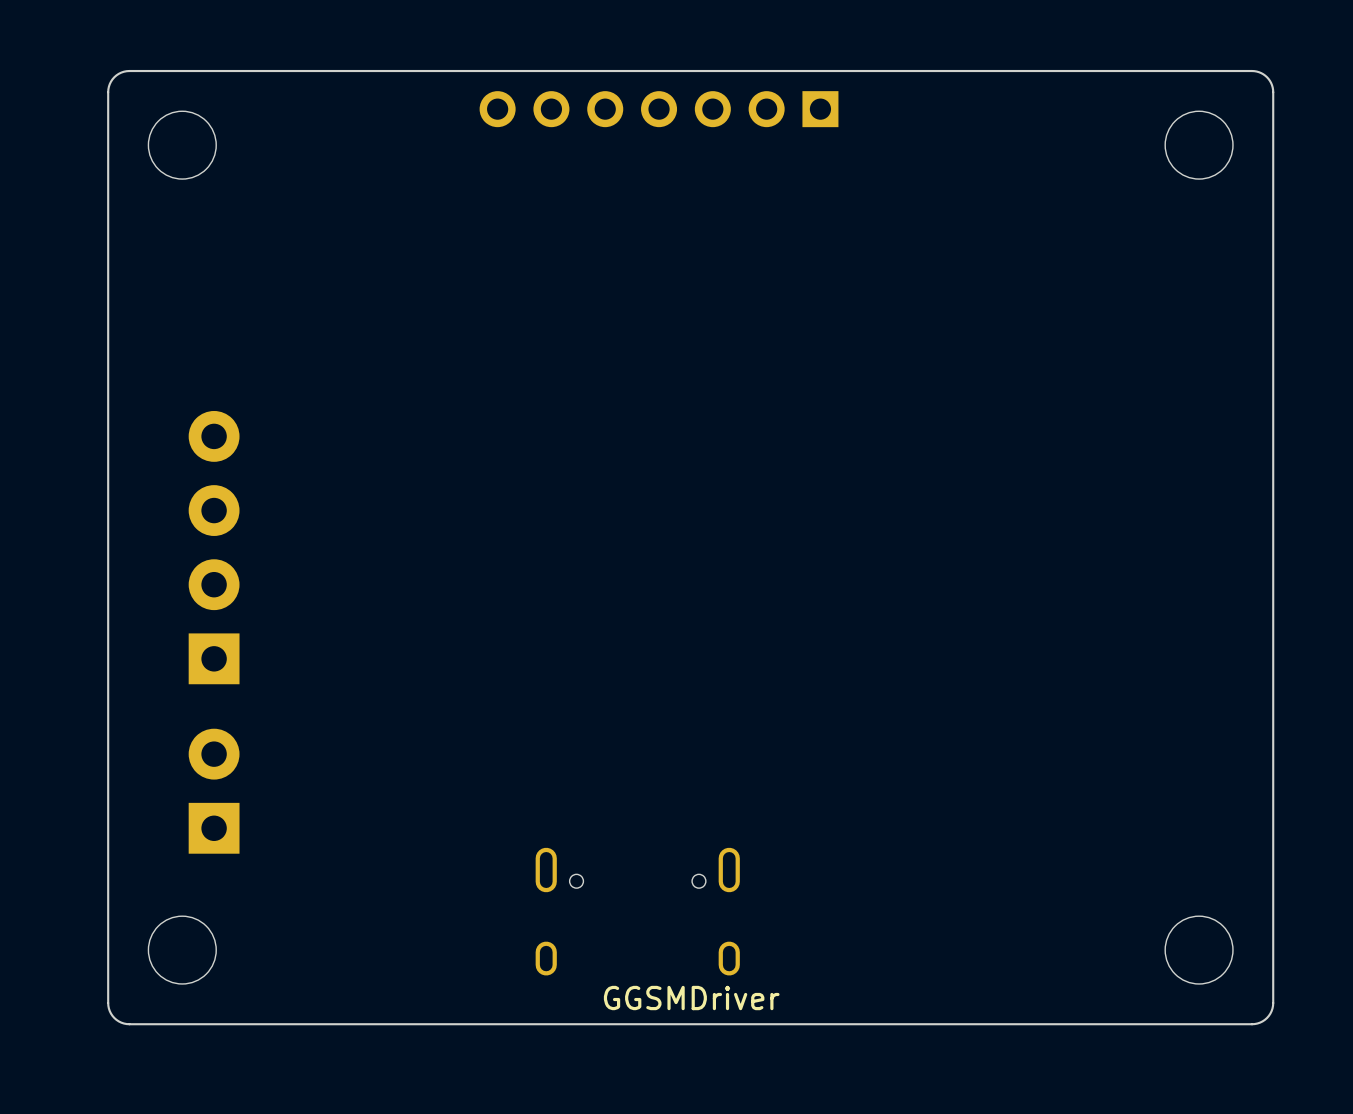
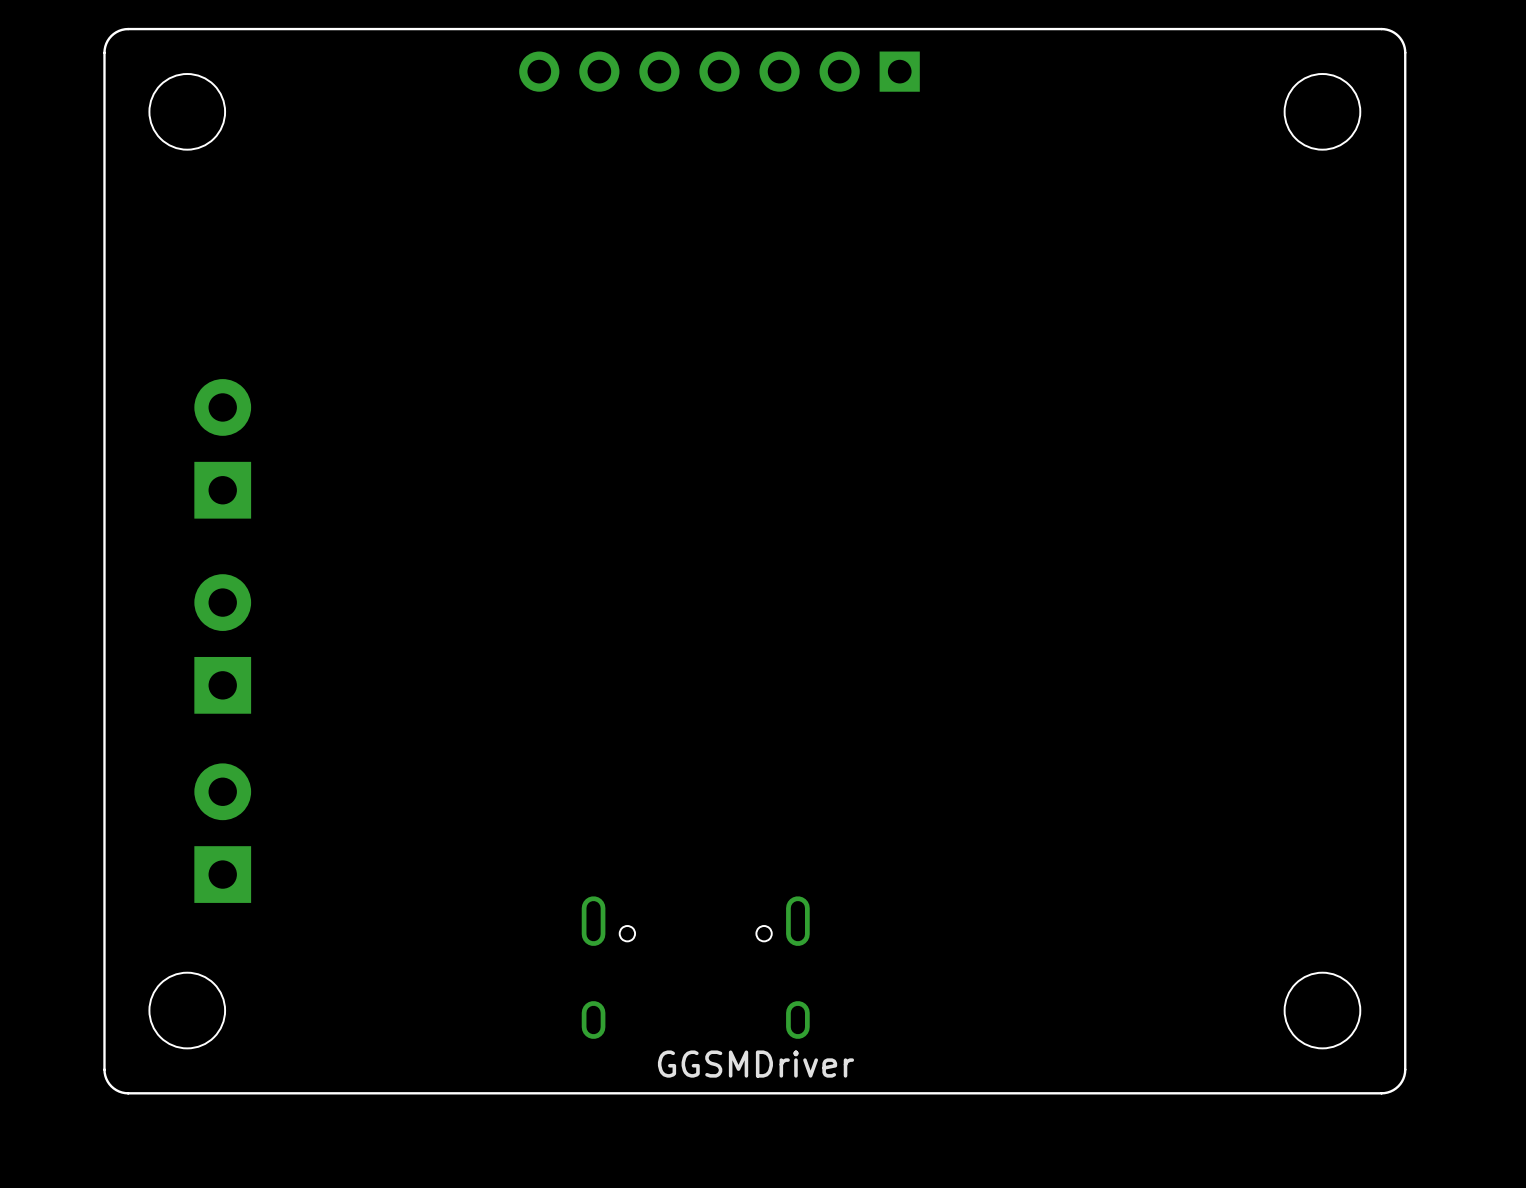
part: none -> (222, 448)
part: (214, 547) -> none

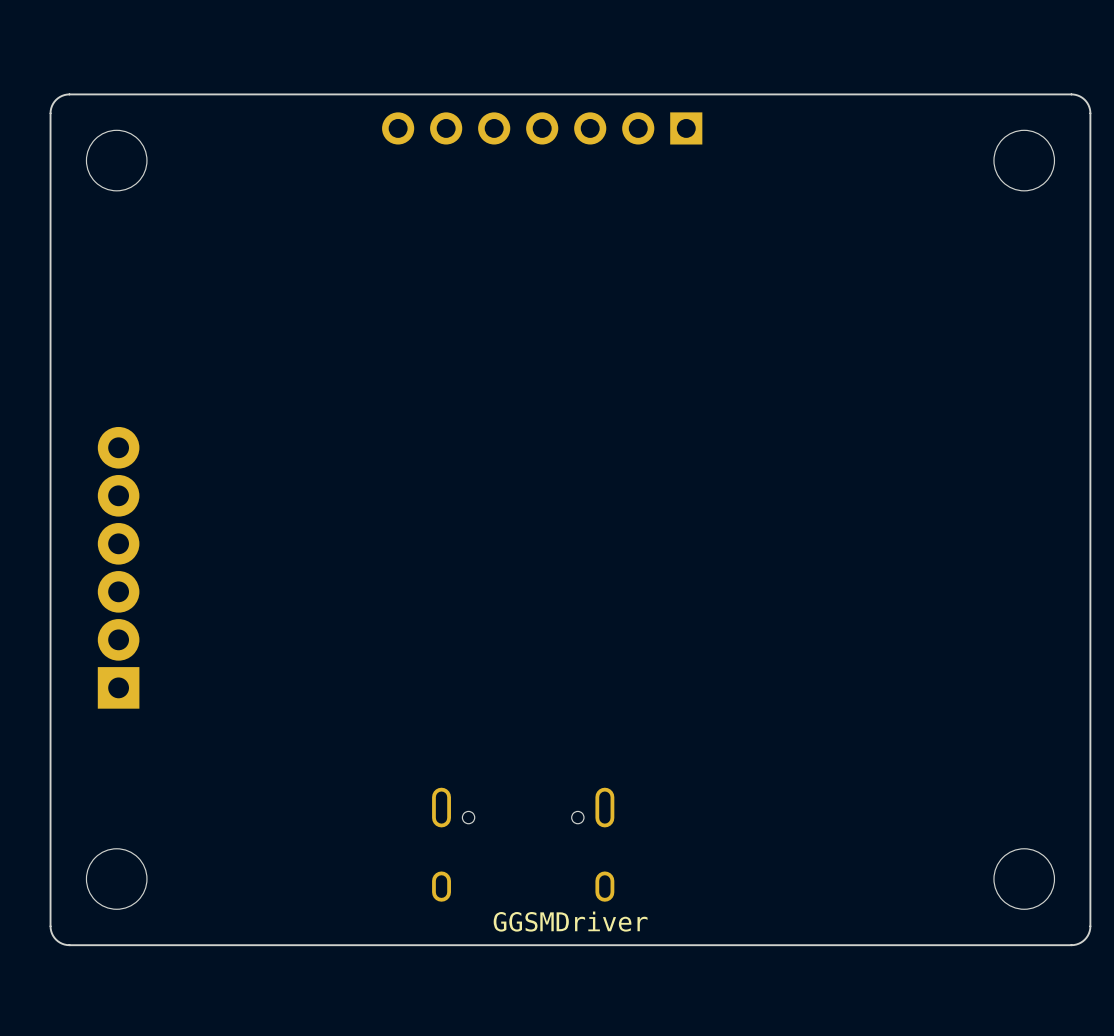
part: (222, 448) -> none
part: none -> (118, 567)
part: (222, 643) -> none
part: (222, 833) -> none

